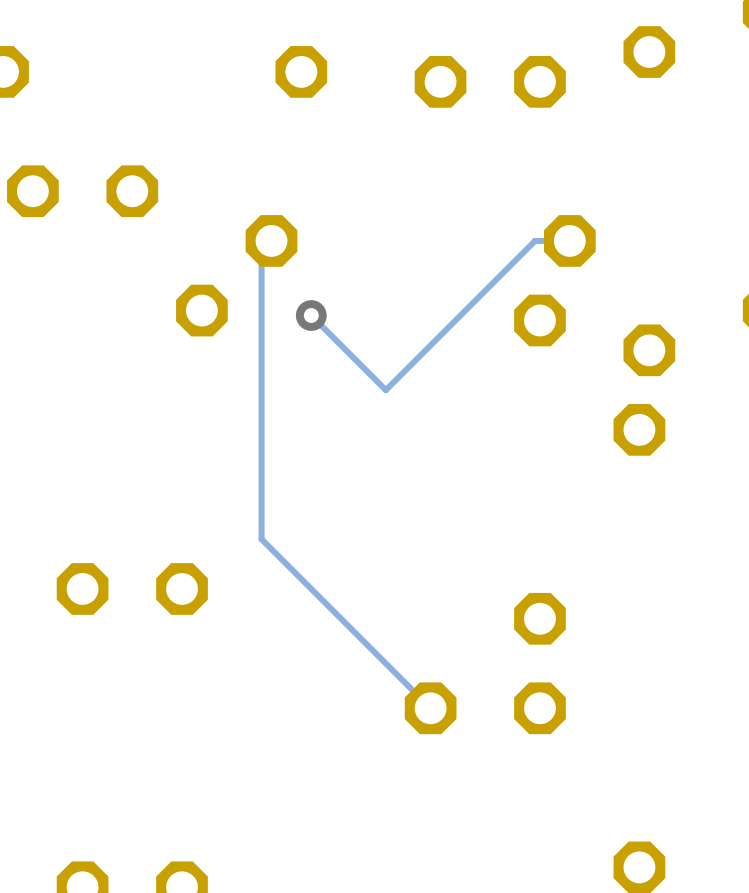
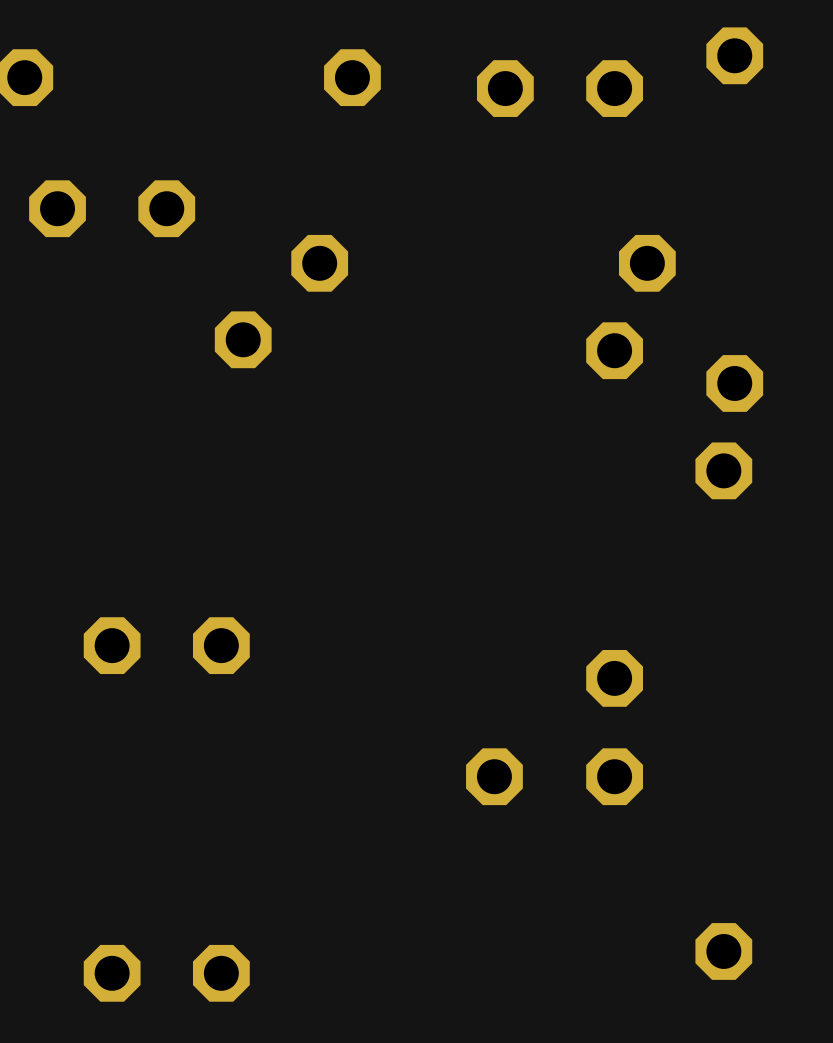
track: (271, 240) (261, 240) (261, 539) (435, 713) -> none
track: (569, 240) (535, 240) (385, 390) (311, 315) -> none
via: (311, 315) -> none

